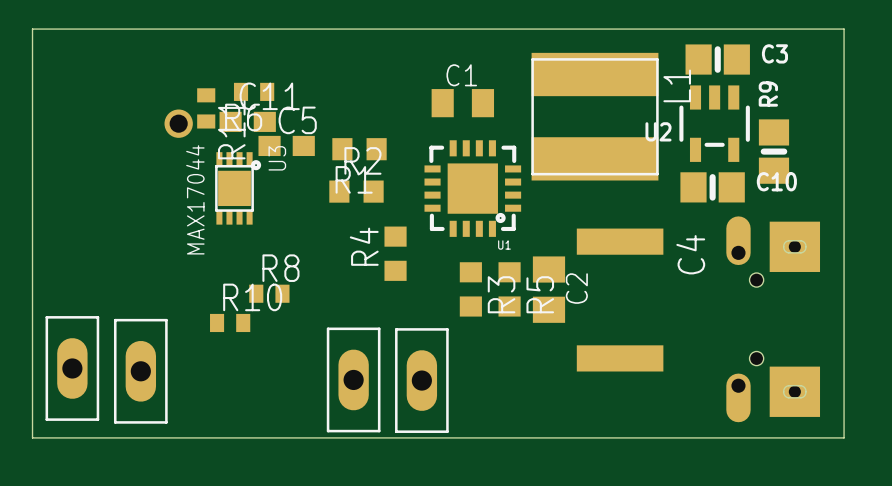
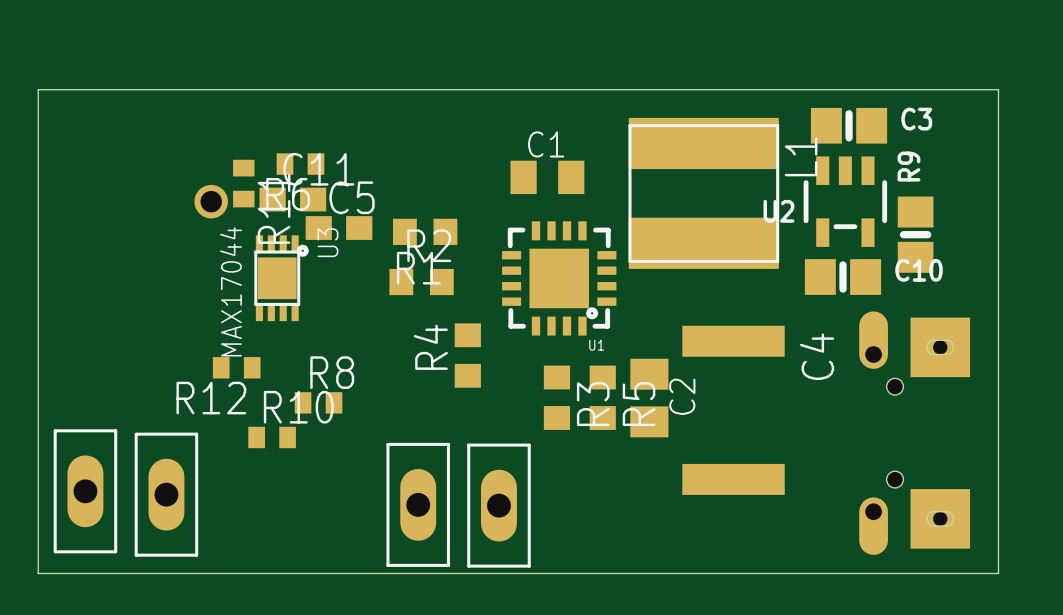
R12: none -> (236, 367)

